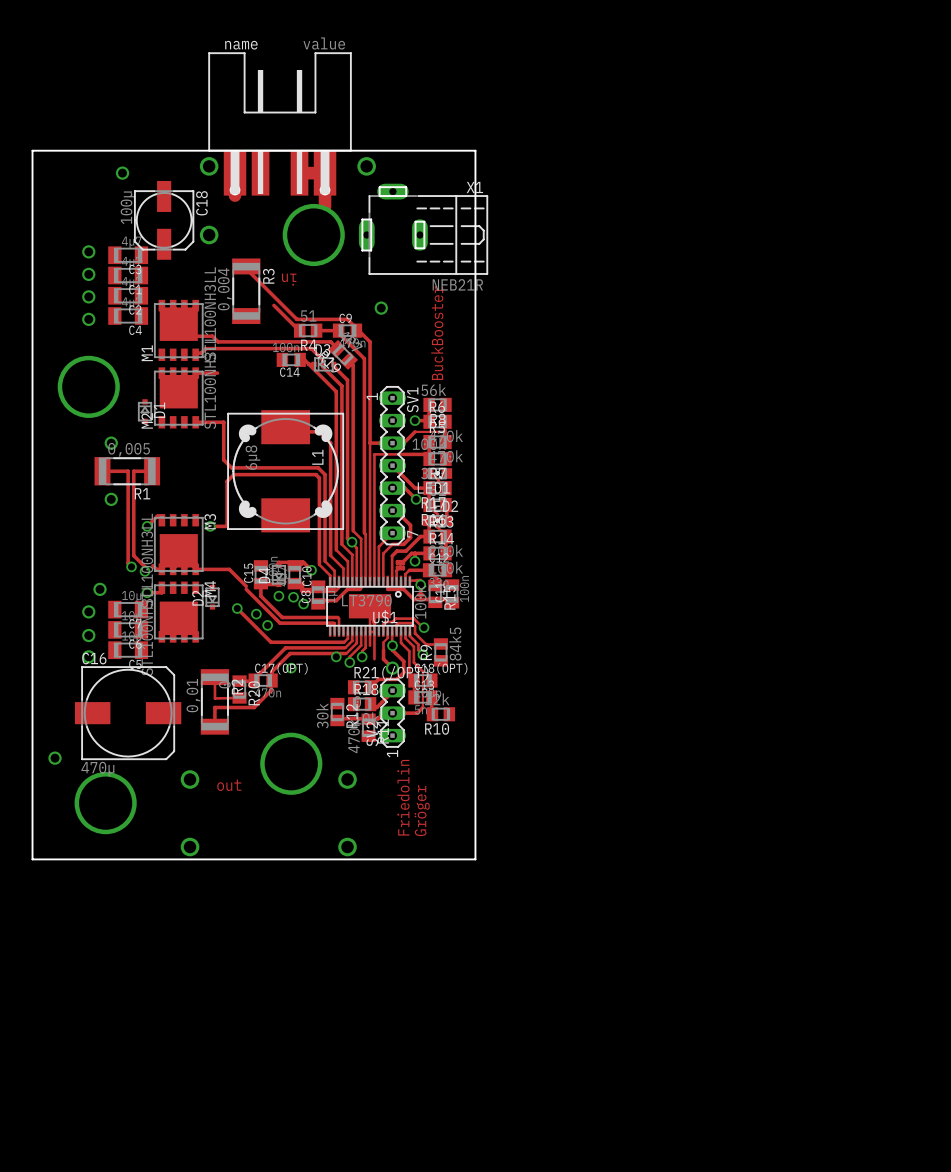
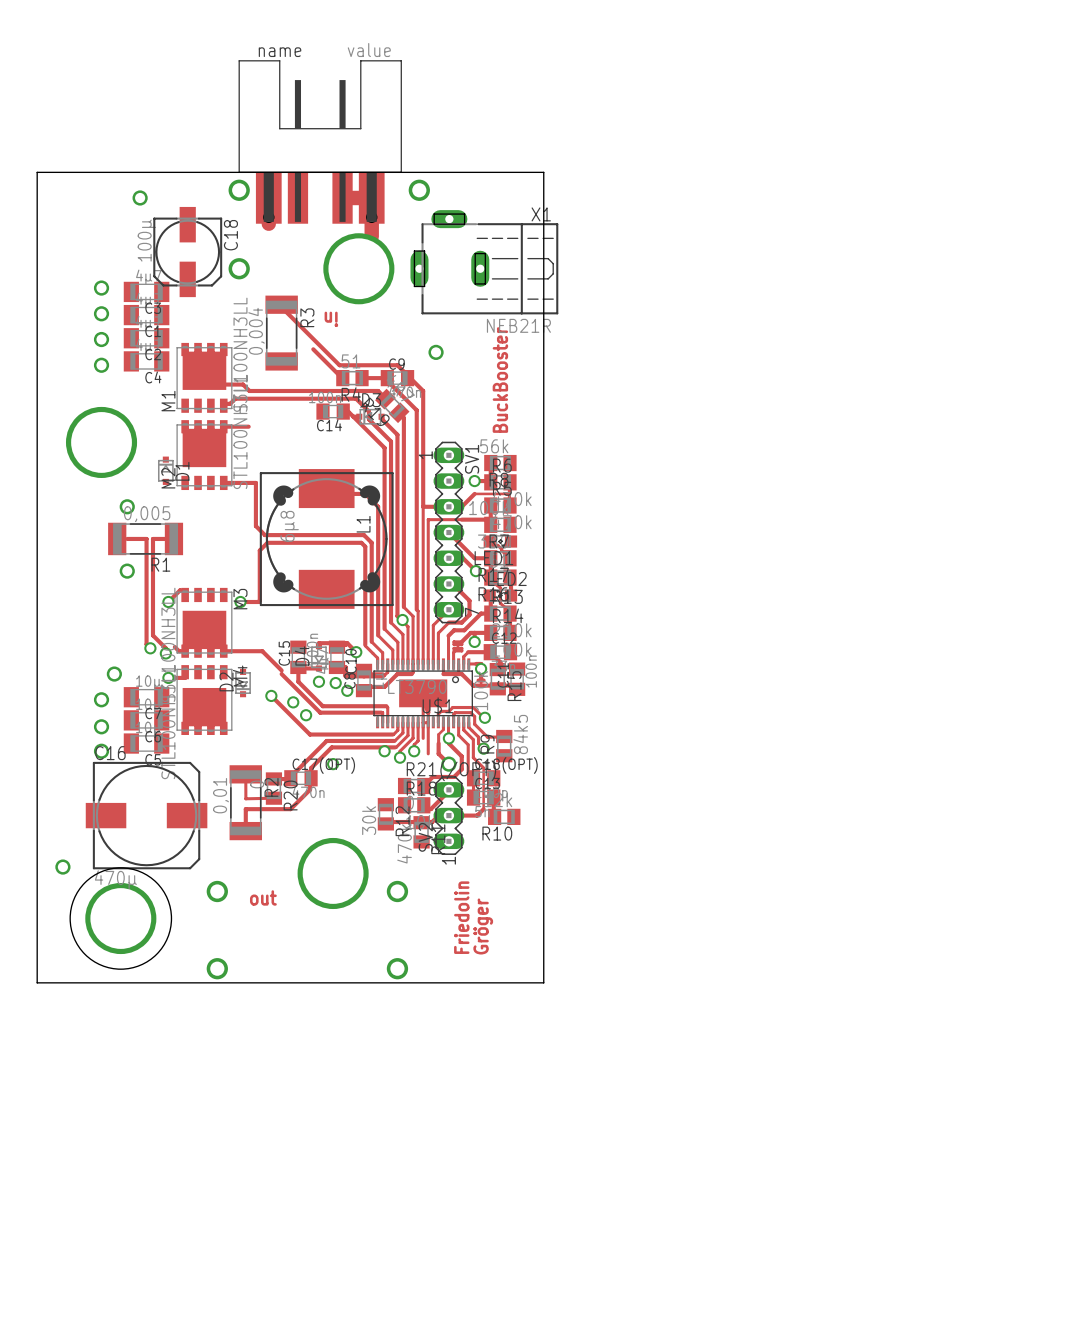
round board edge: none -> [70, 867, 172, 970]

